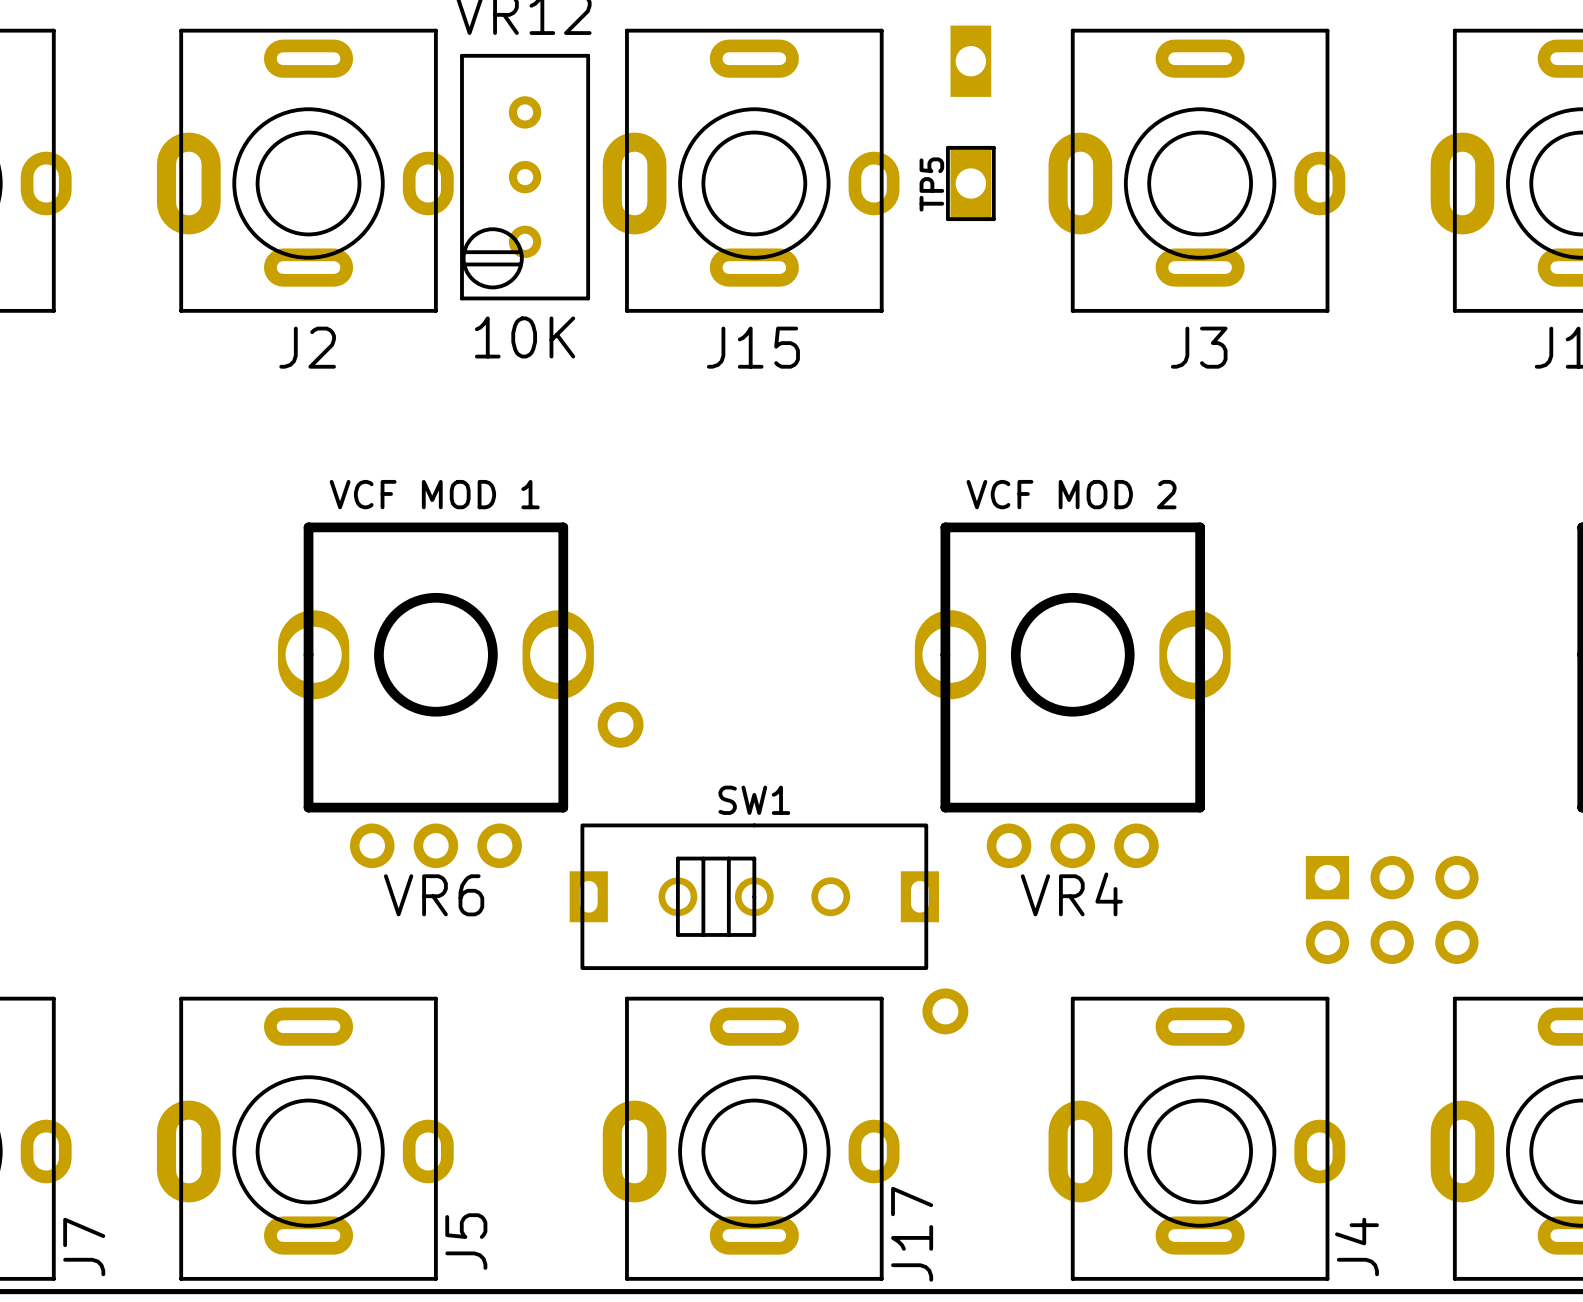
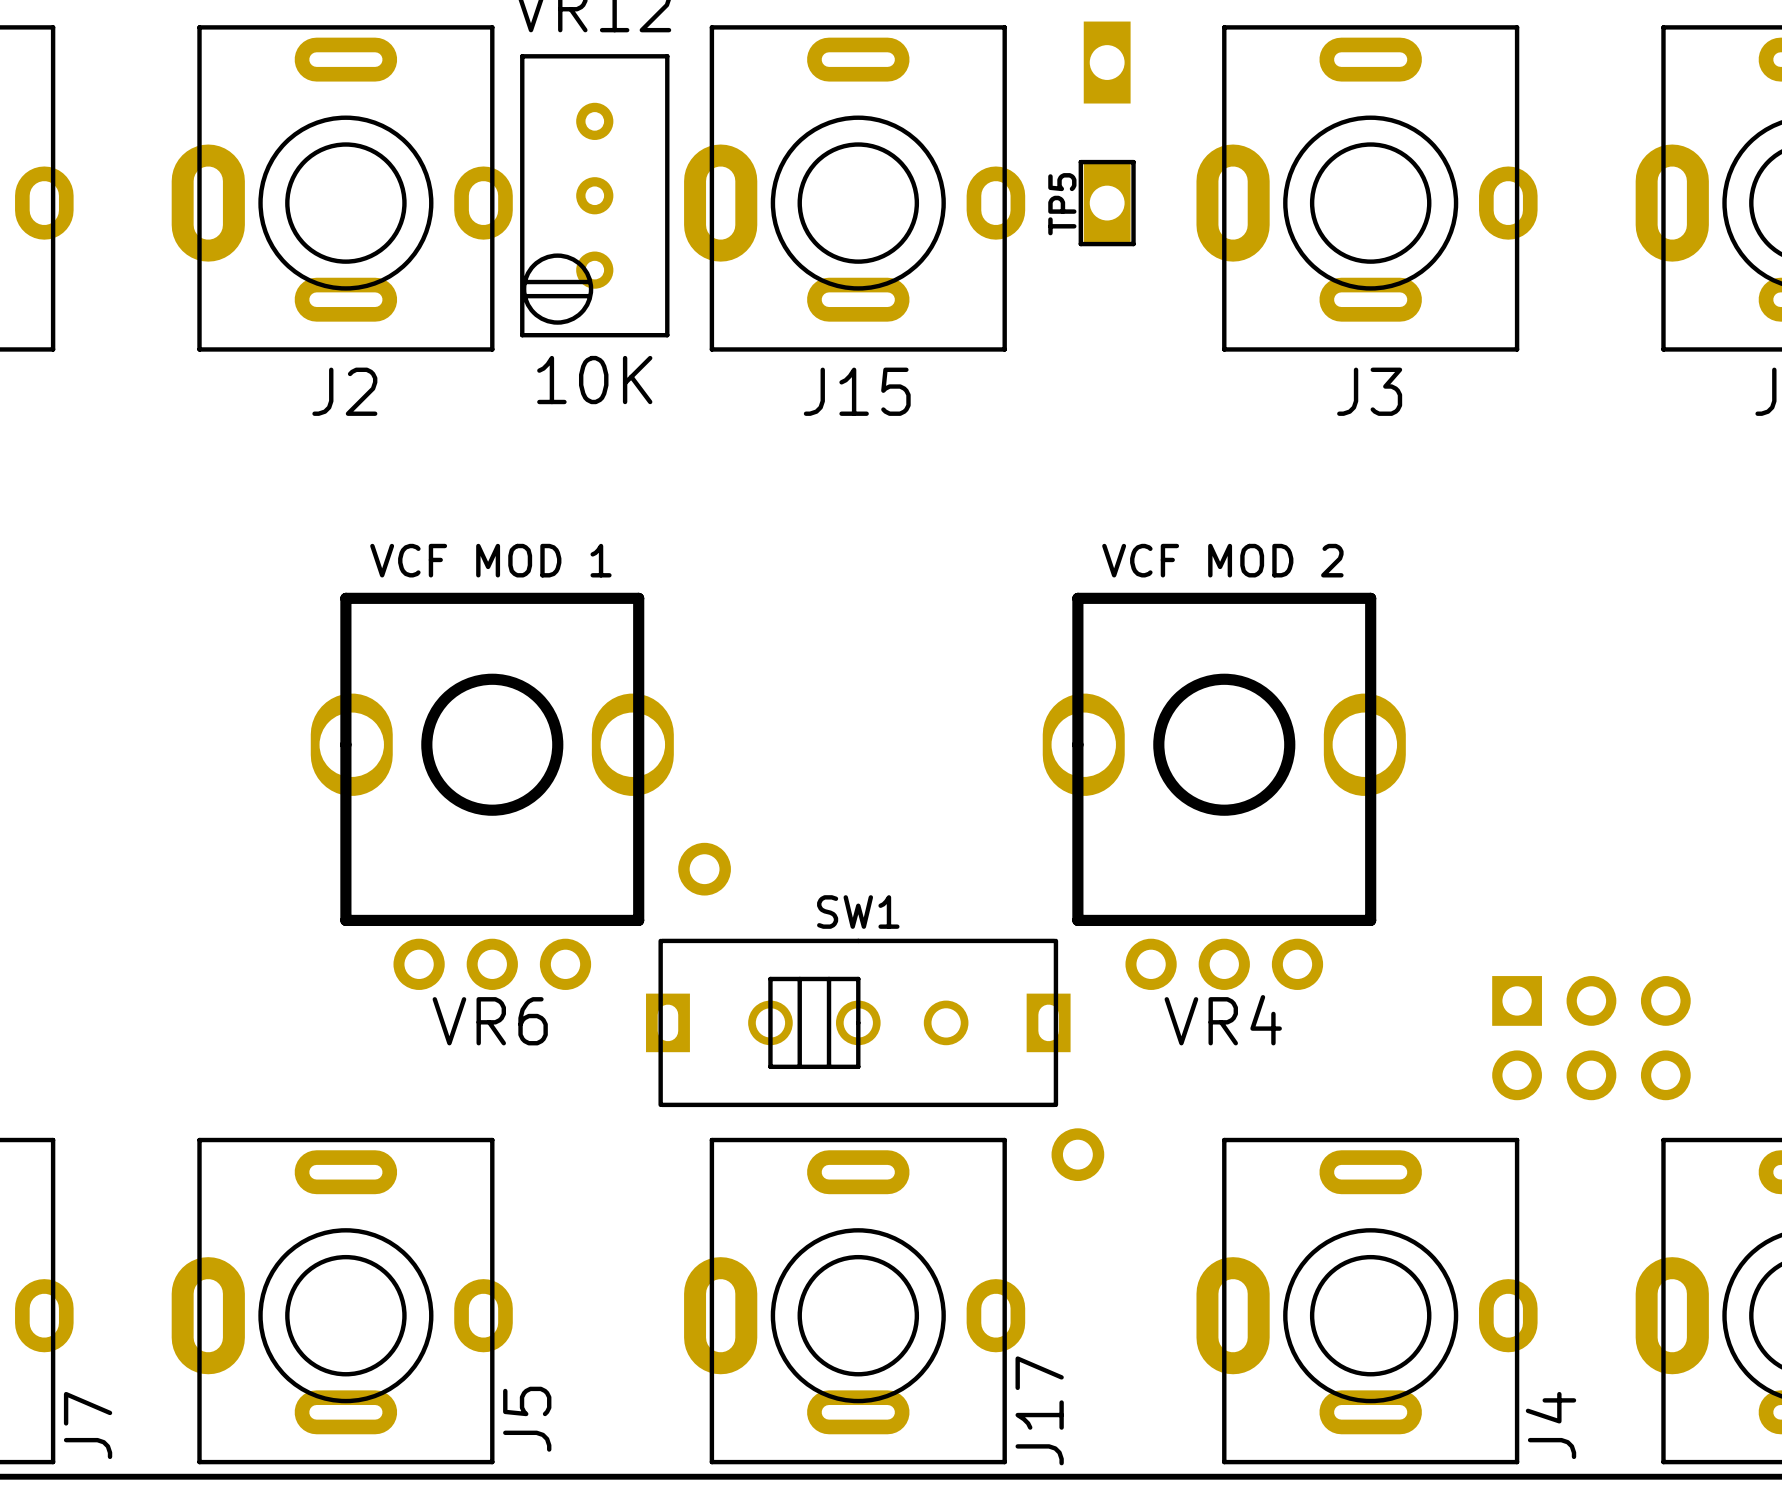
part position: (620, 724) -> (704, 869)

